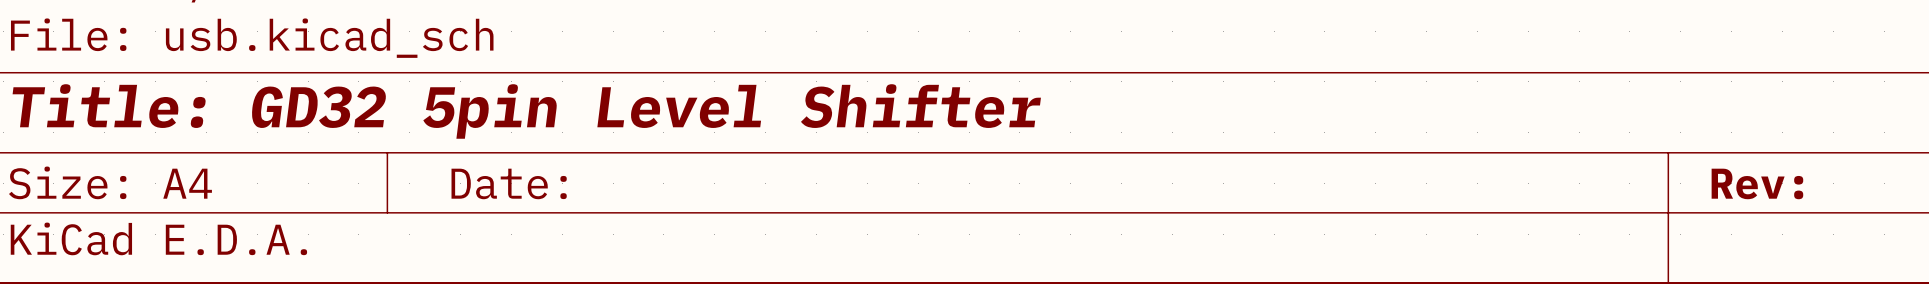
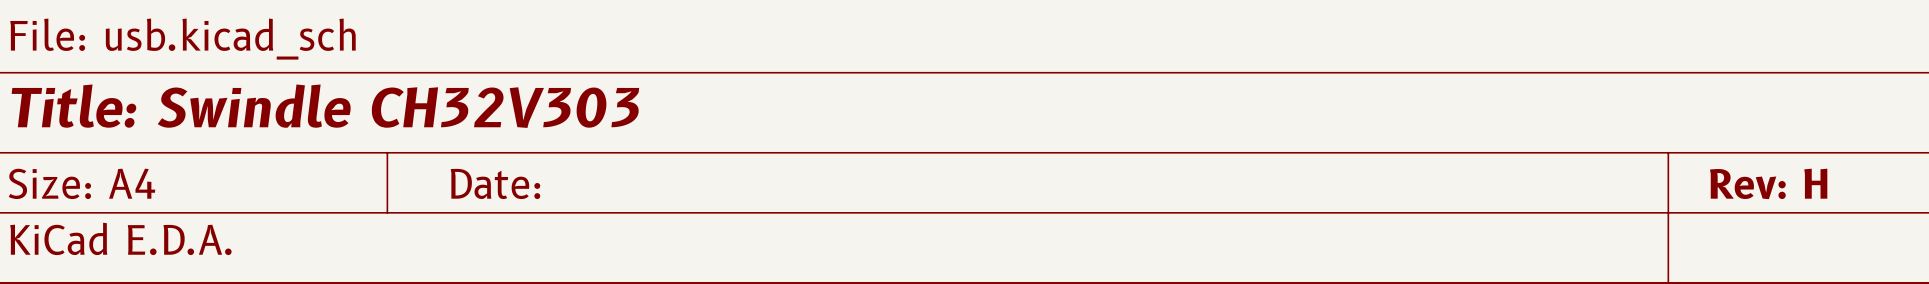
title block: Title: GD32 5pin Level Shifter (526, 111) -> Title: Swindle CH32V303 (325, 106)
title block: Rev: (1757, 183) -> Rev: H (1768, 183)

